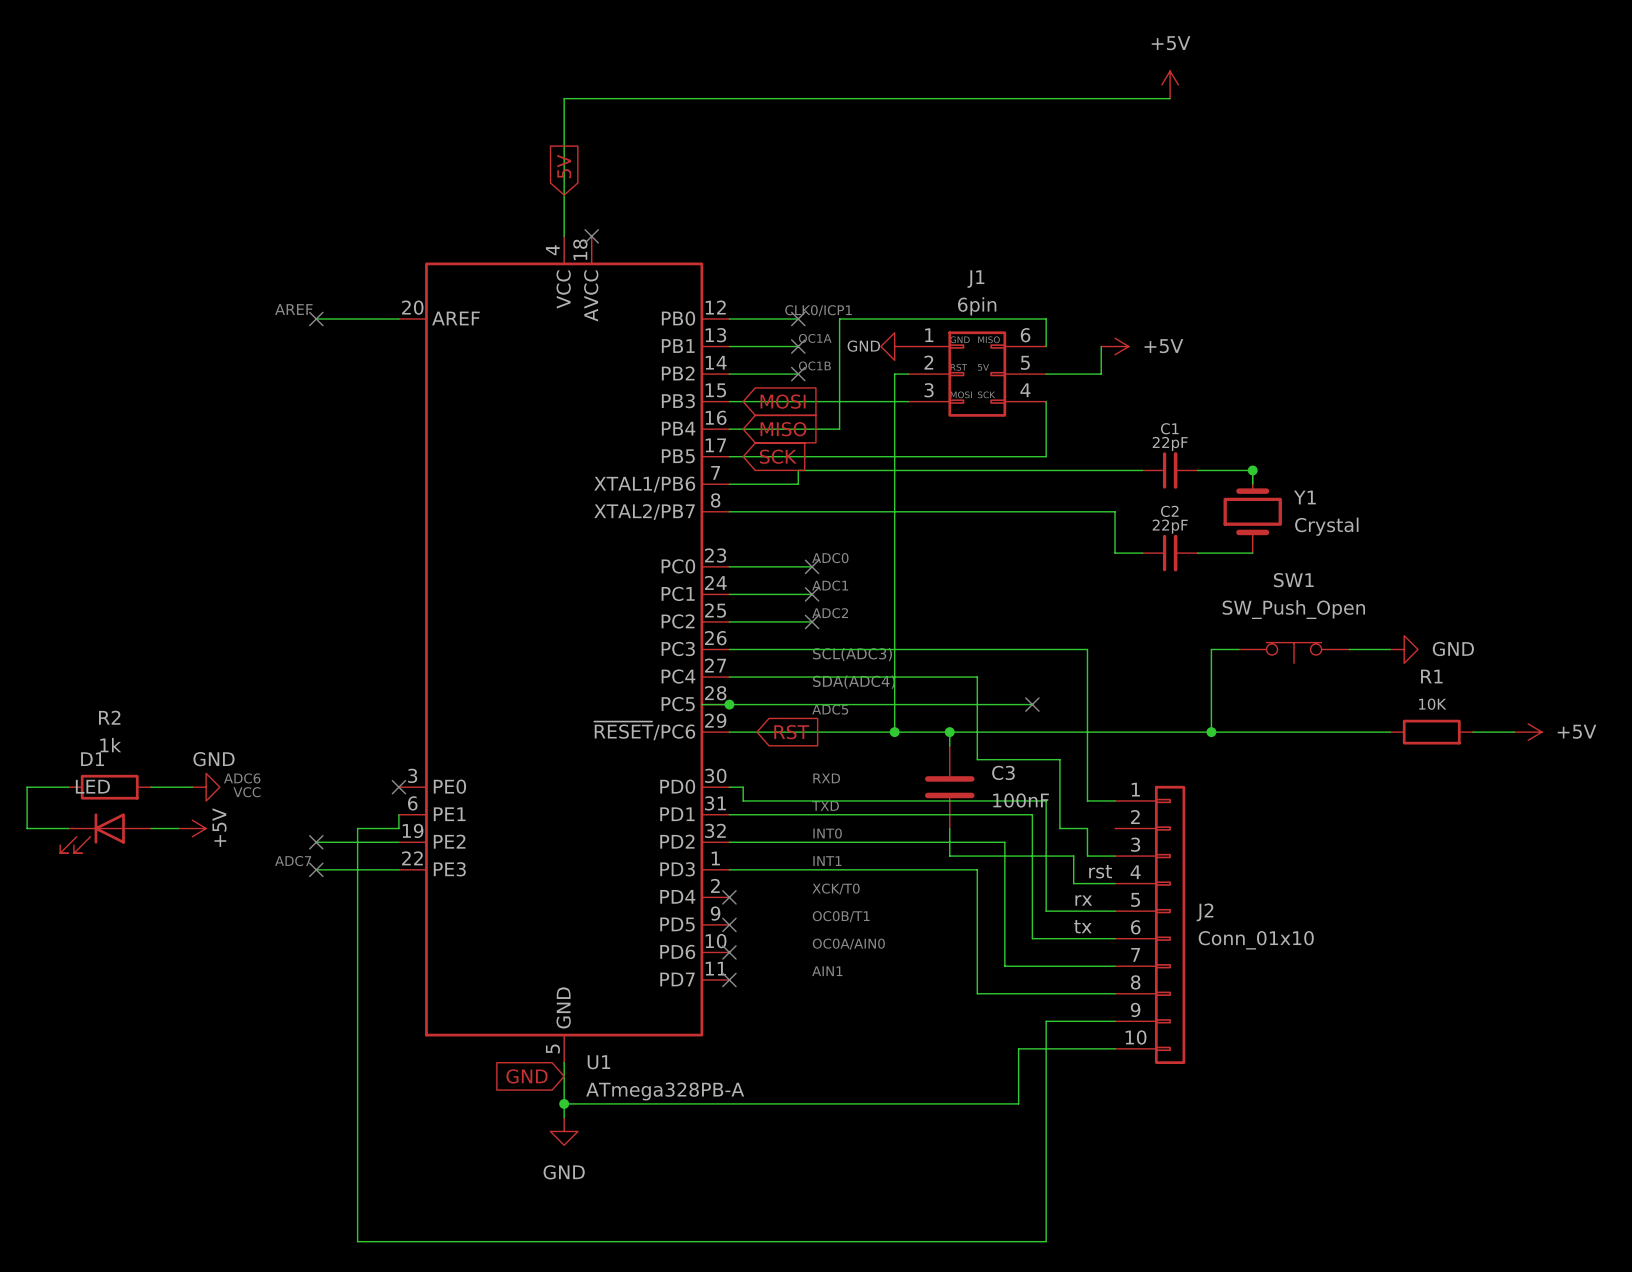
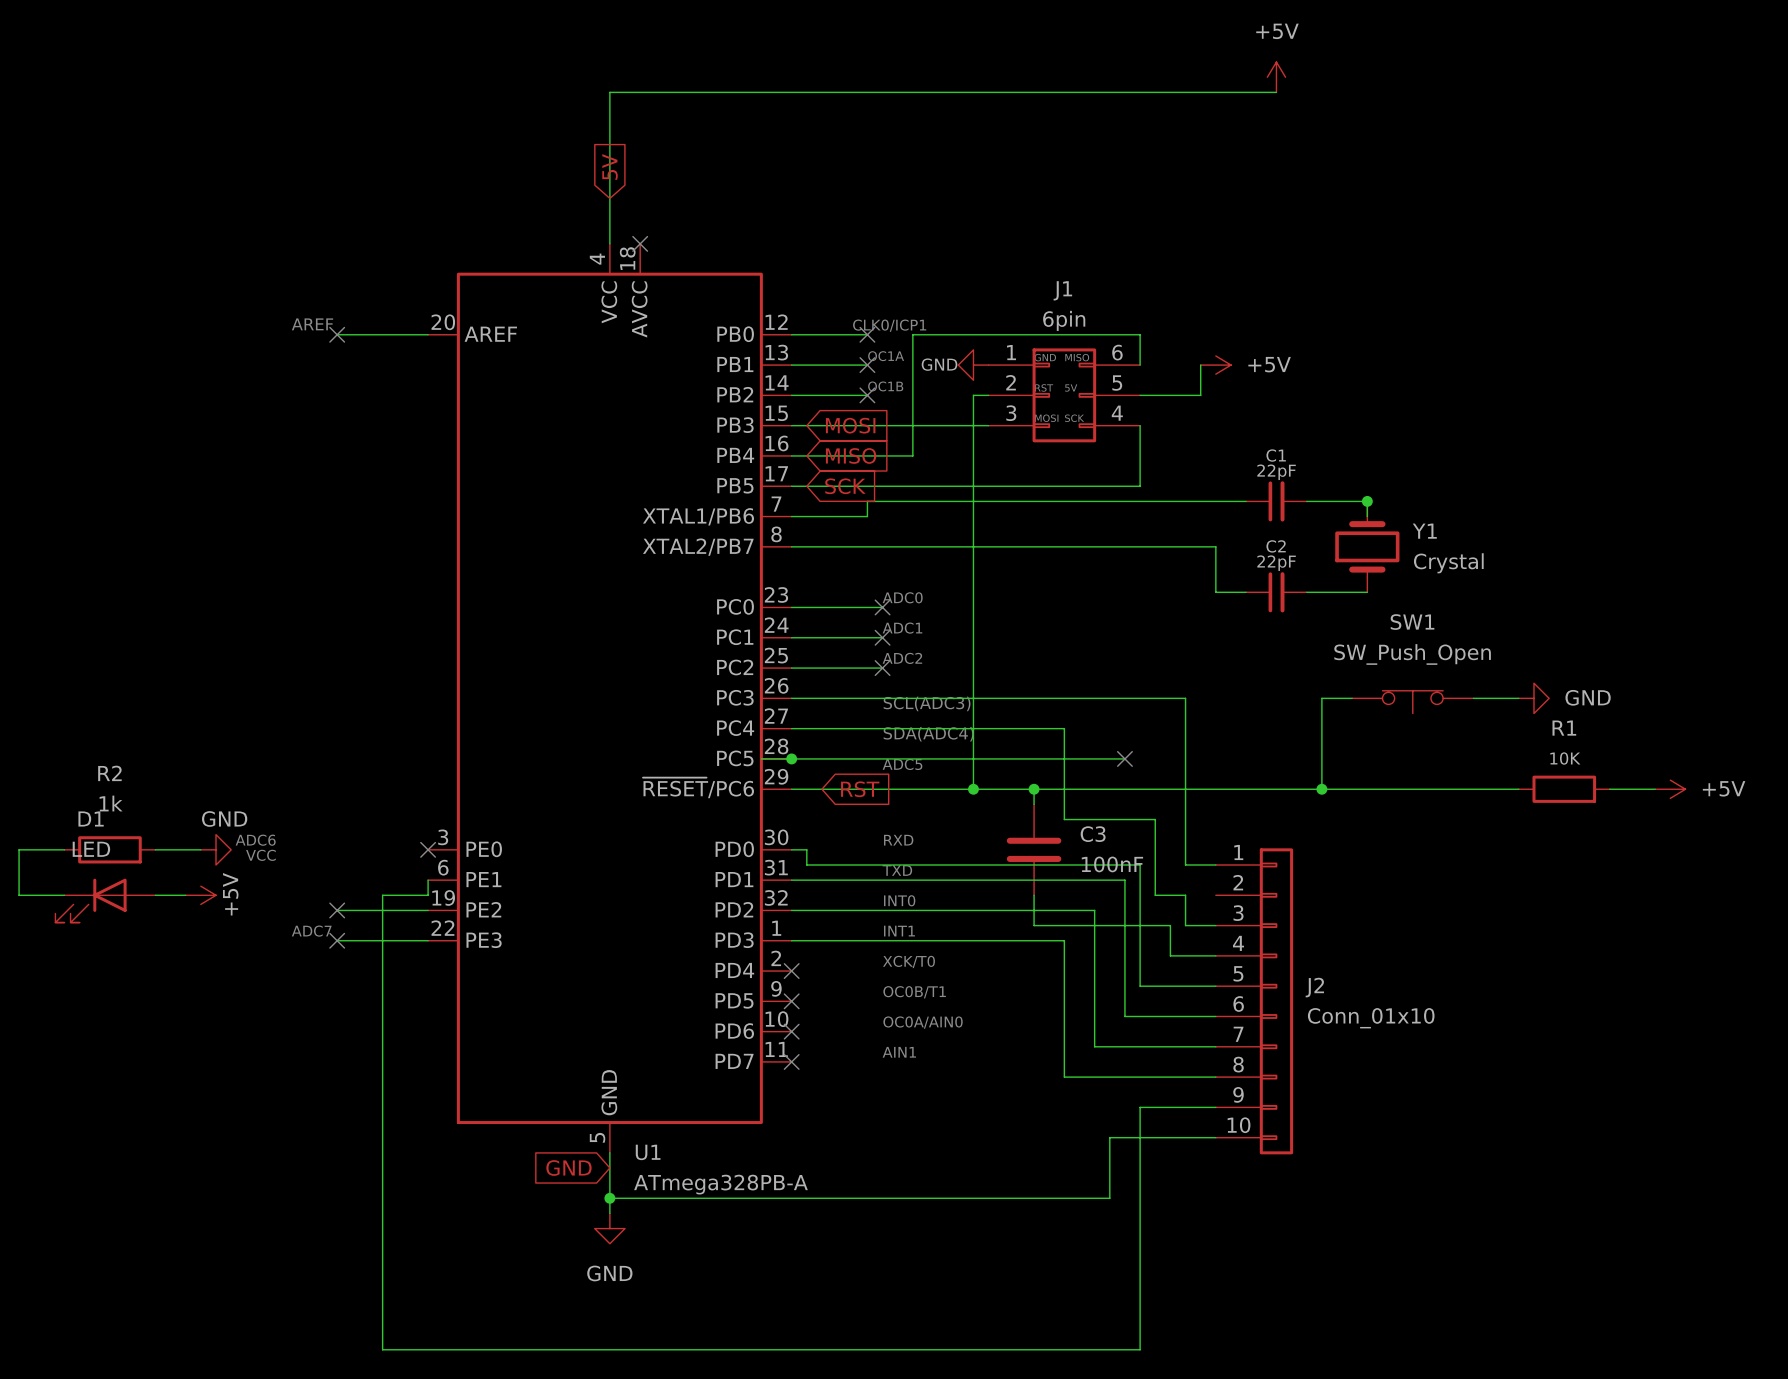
label: rst (1100, 871) -> none
label: rx (1083, 900) -> none
label: tx (1082, 926) -> none

